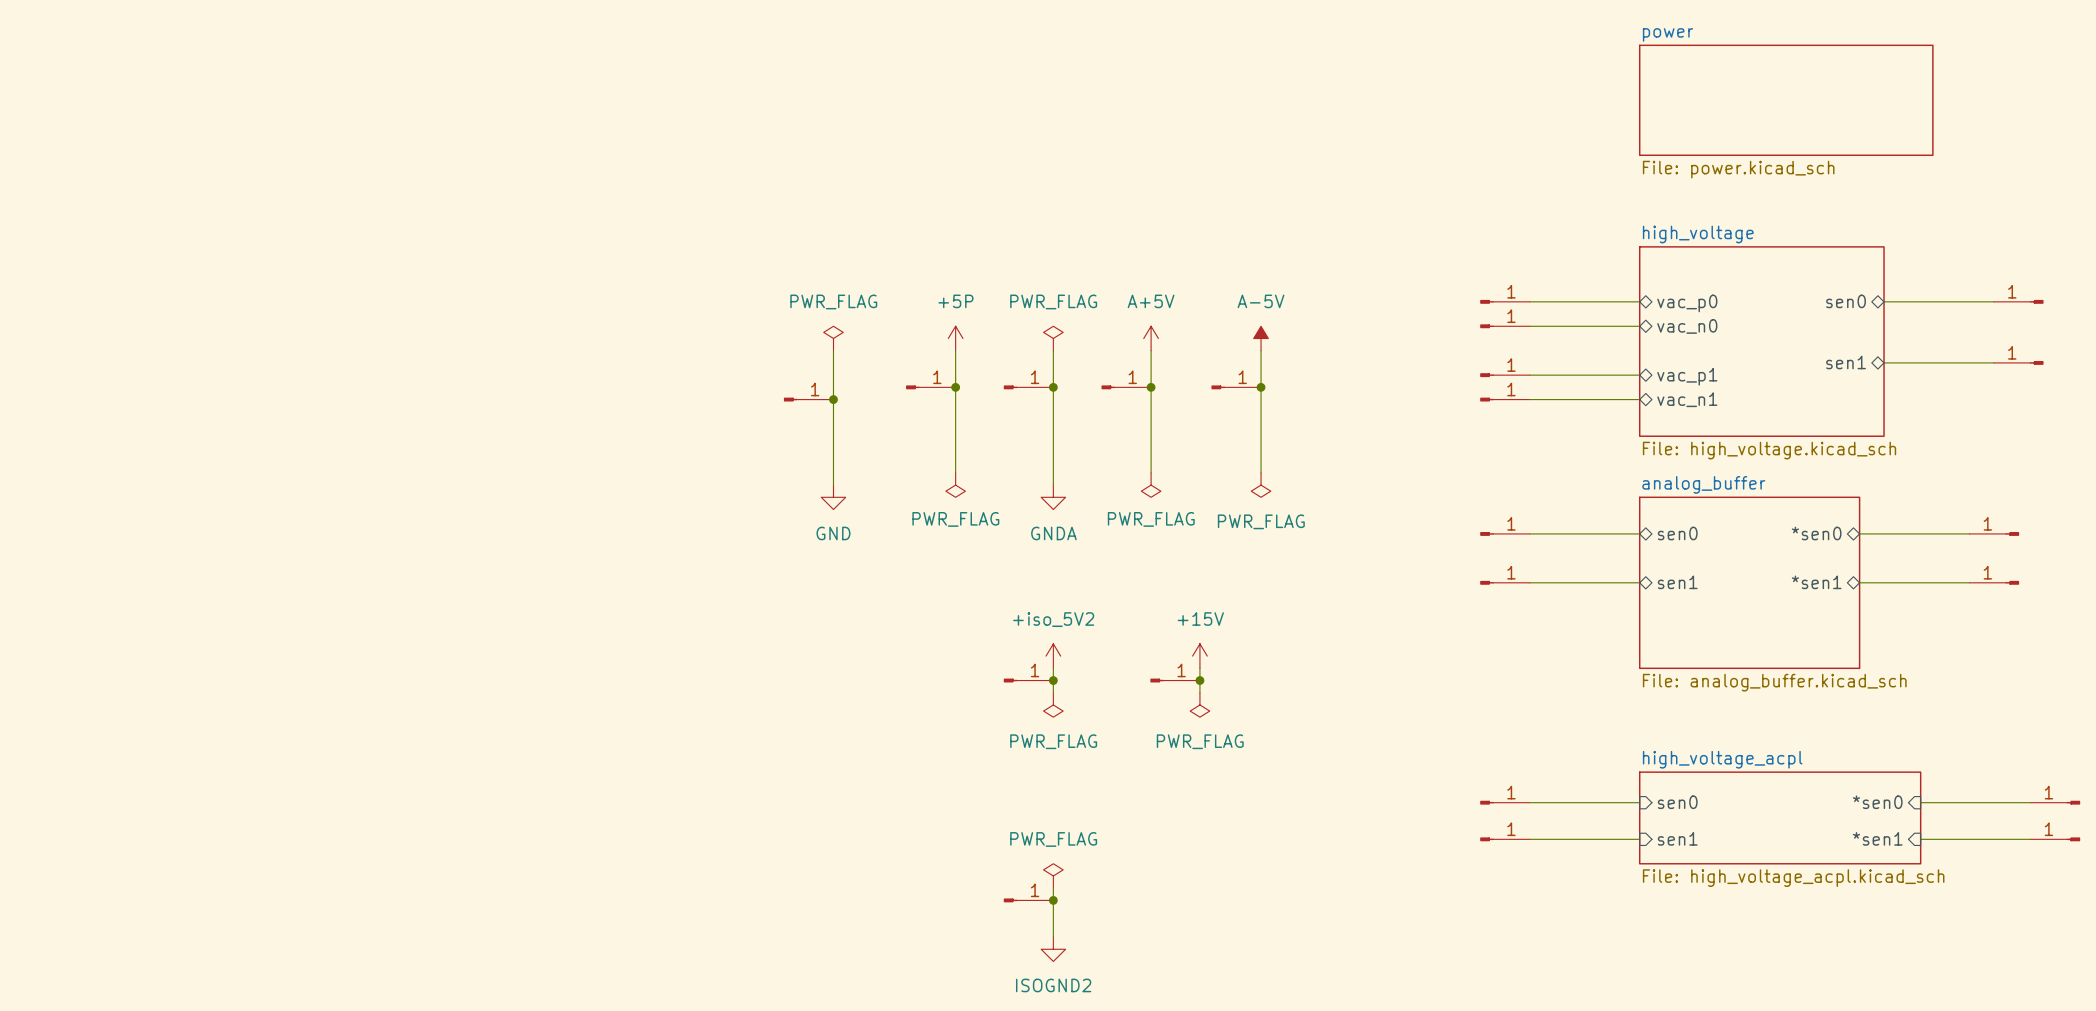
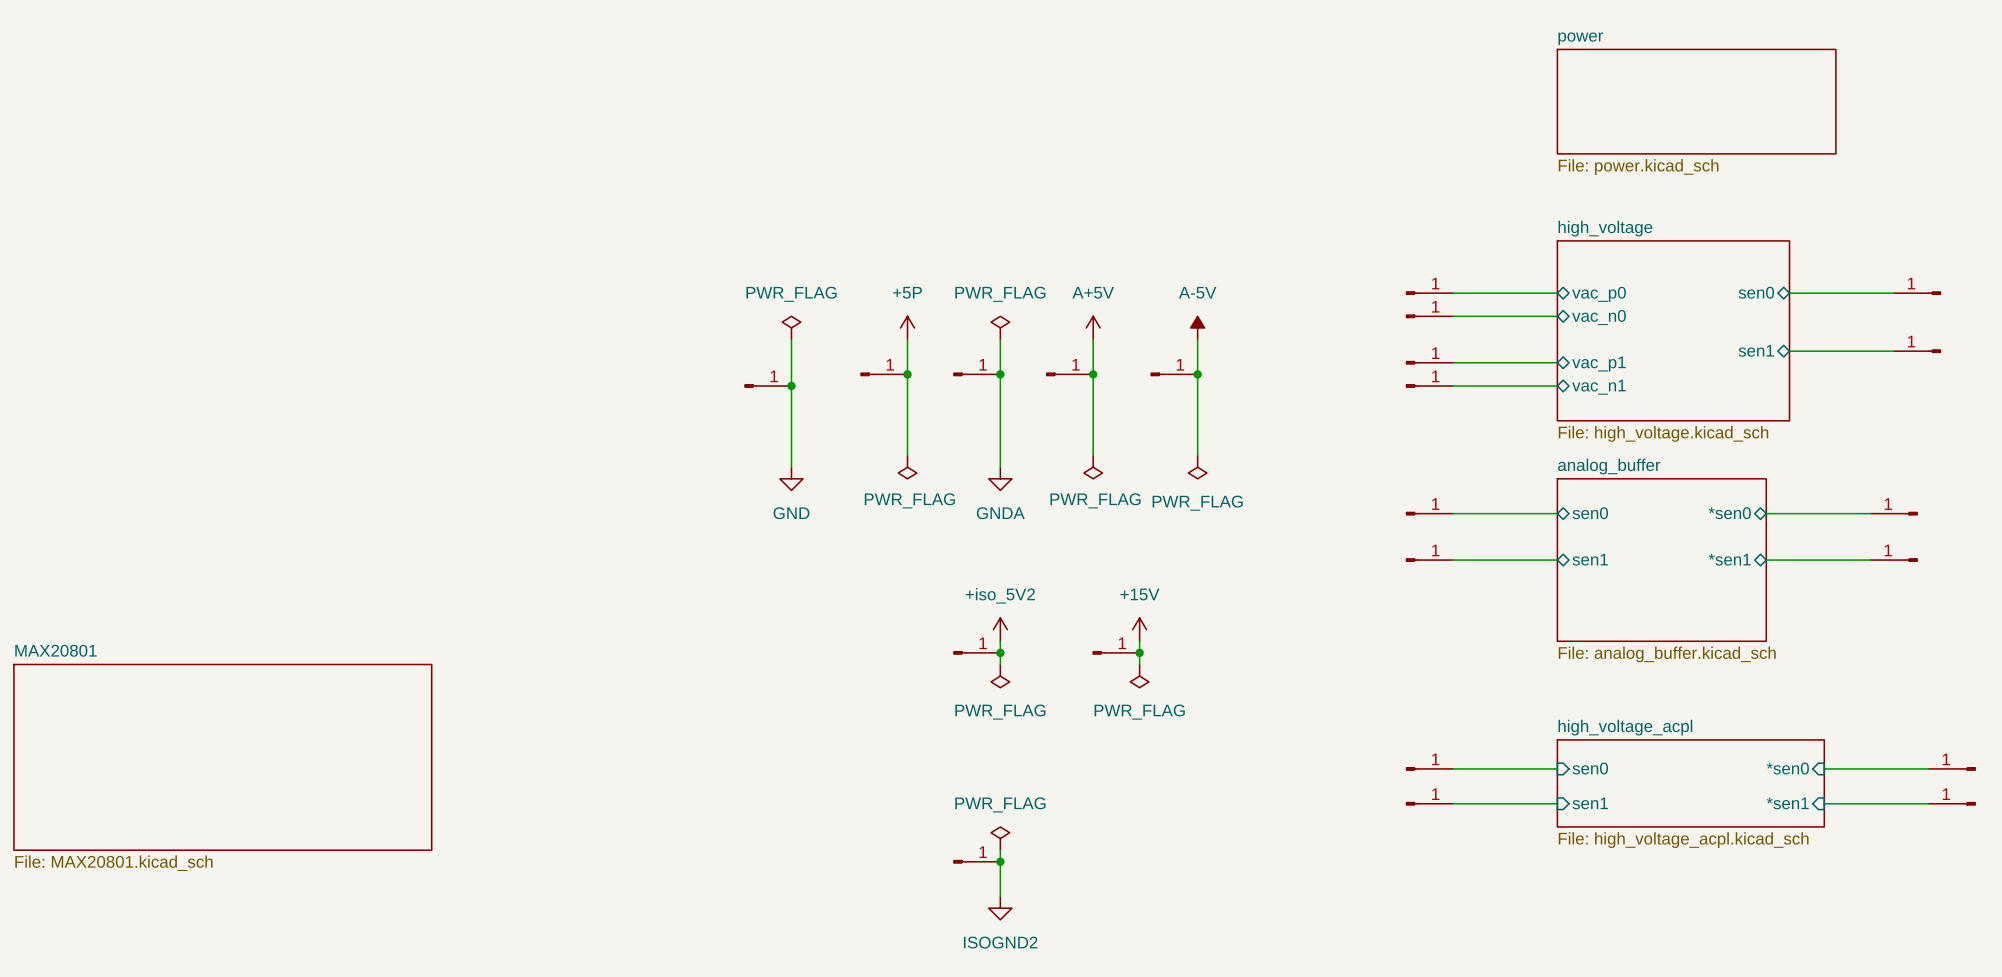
sheet MAX20801: none -> File: MAX20801.kicad_sch (222, 757)

